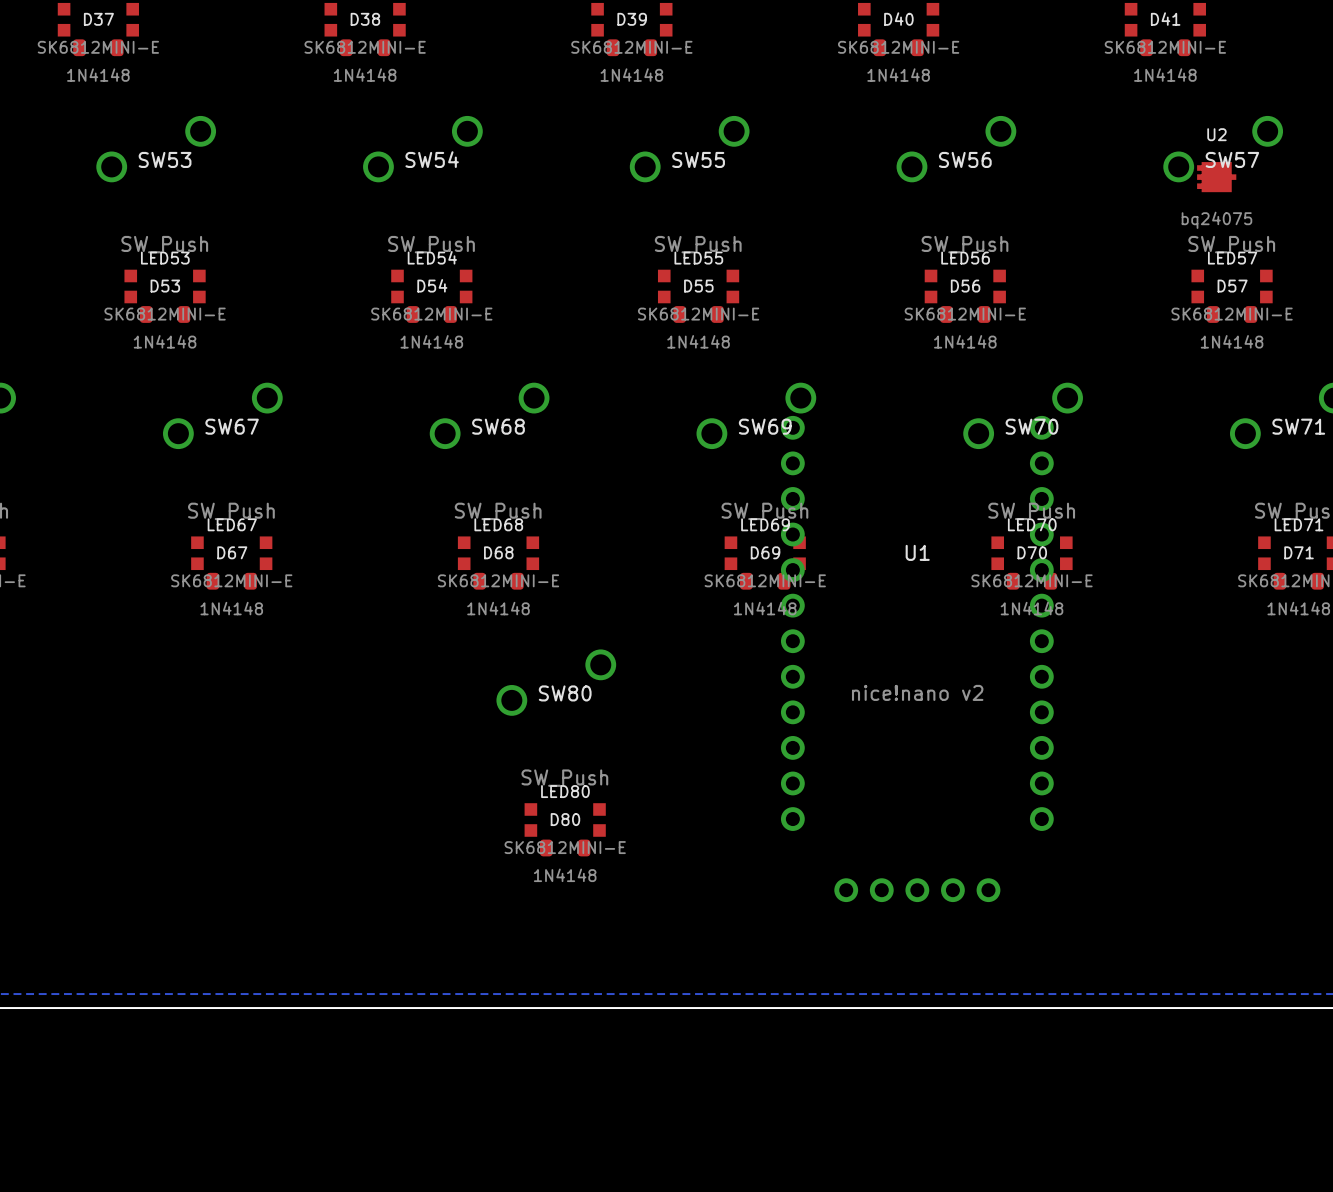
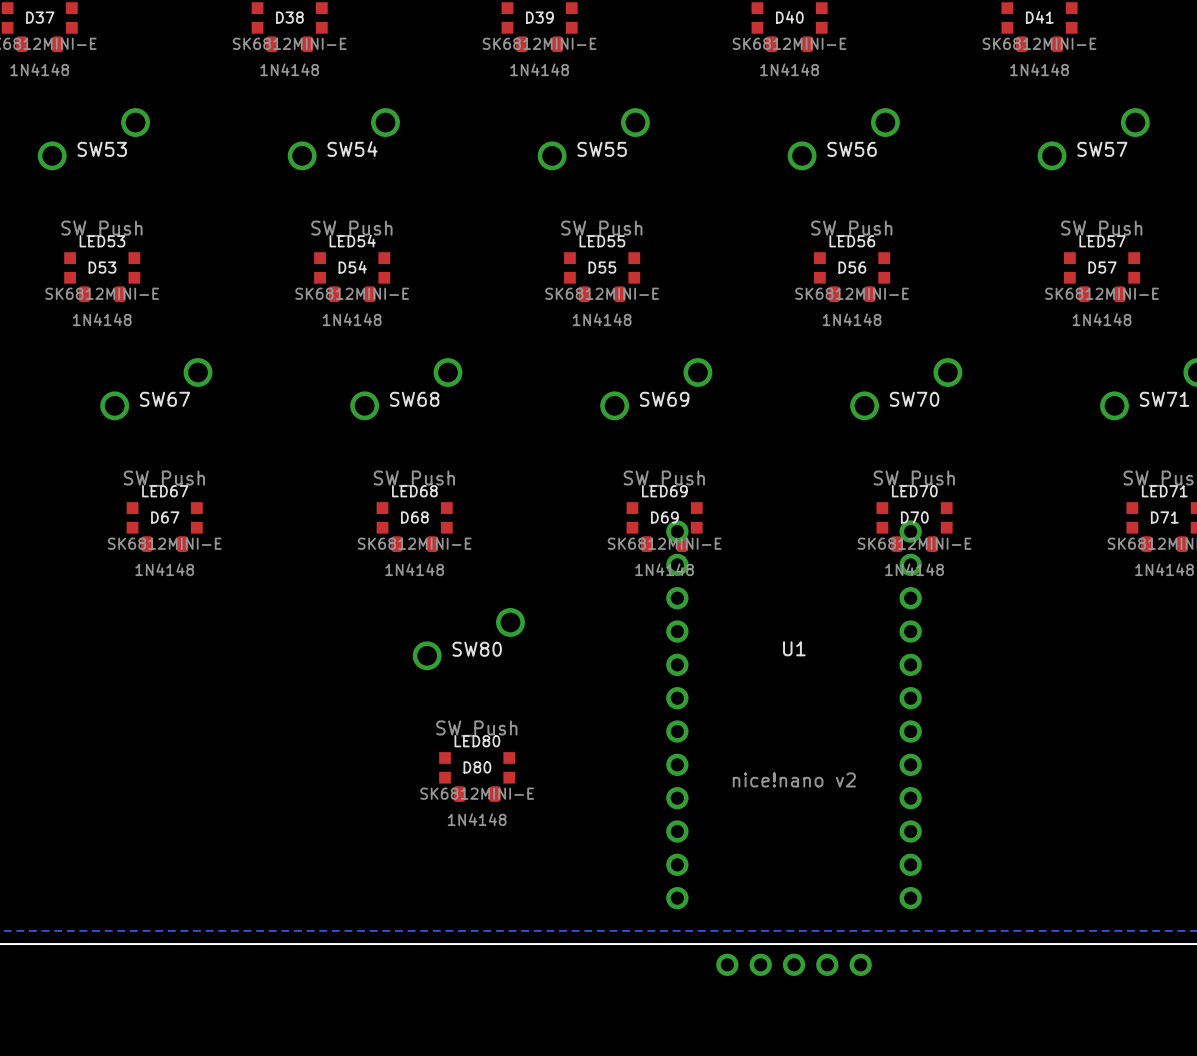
U2: bq24075 (1216, 177) -> none
U1 position: (917, 658) -> (794, 748)

